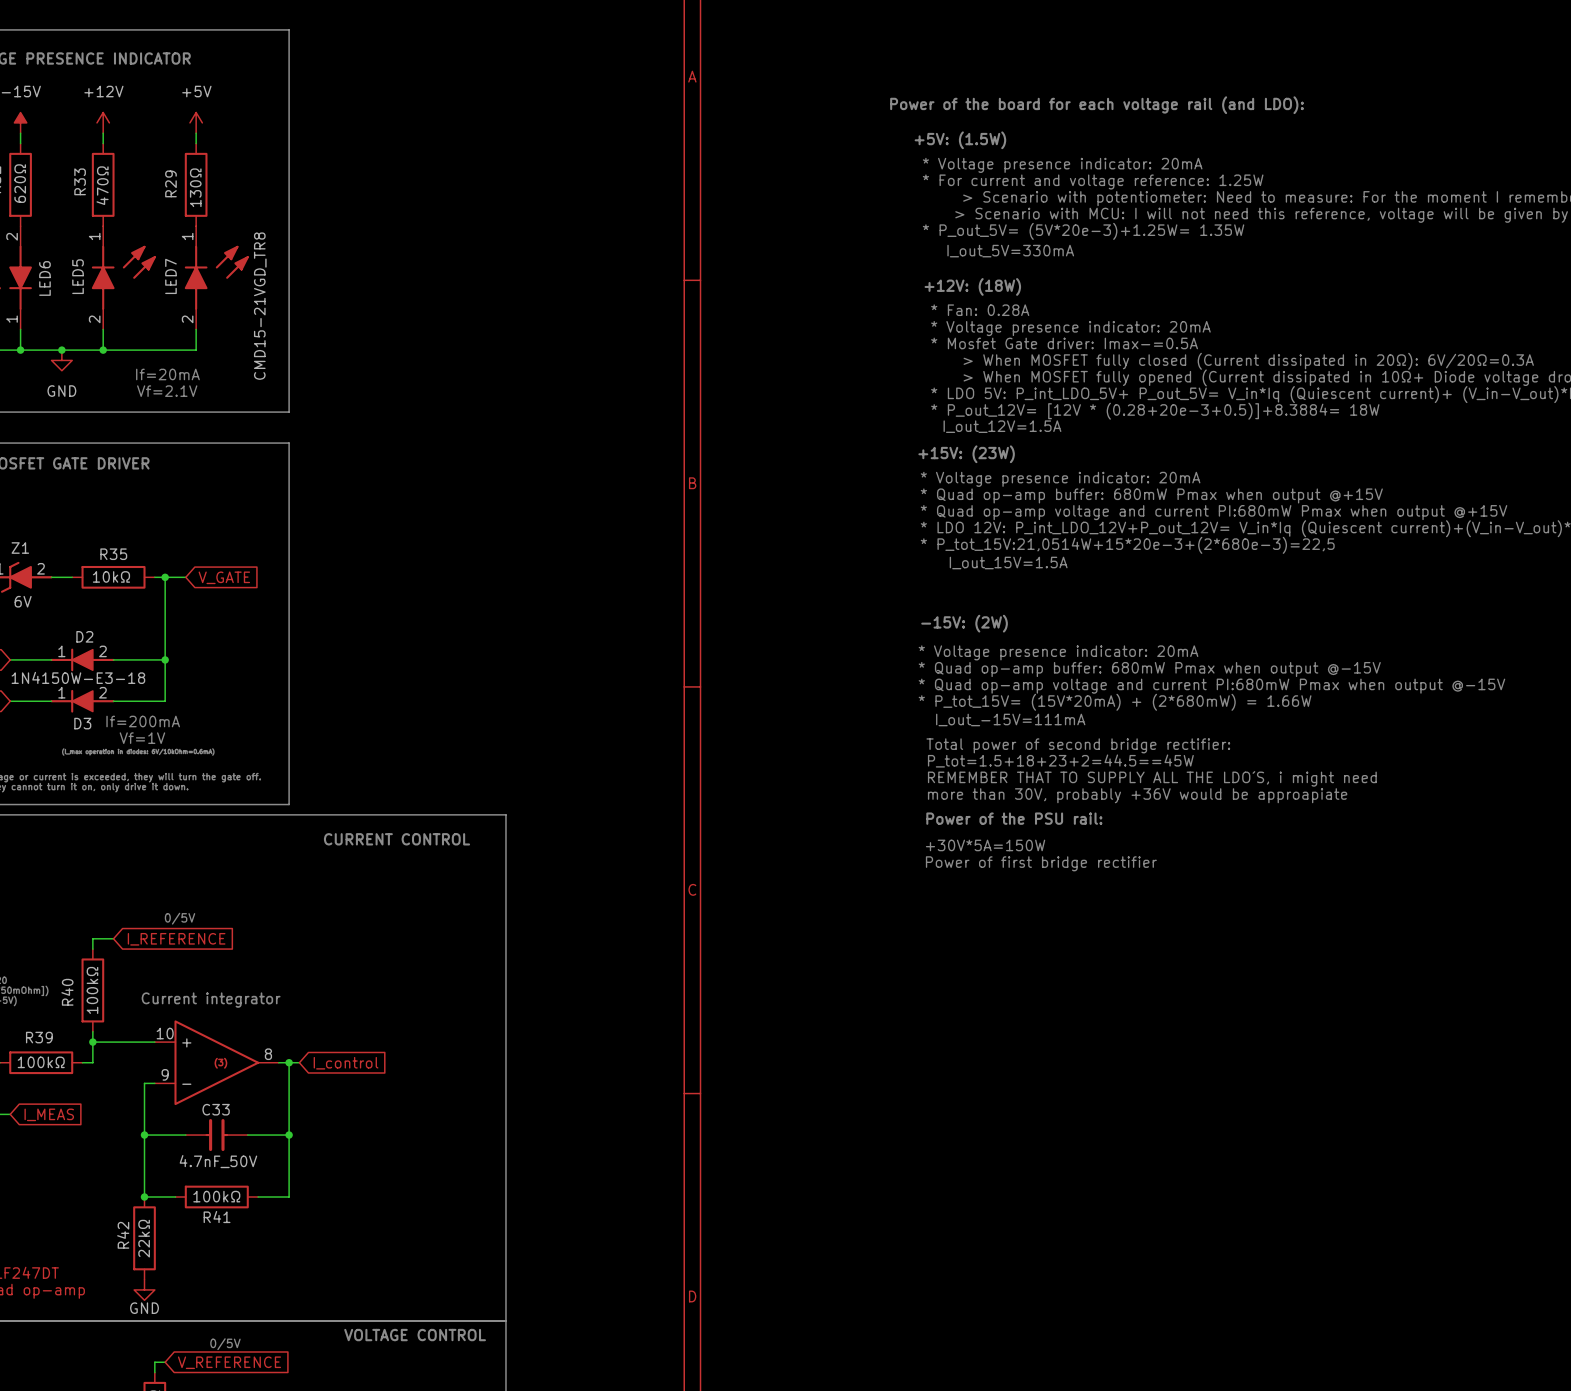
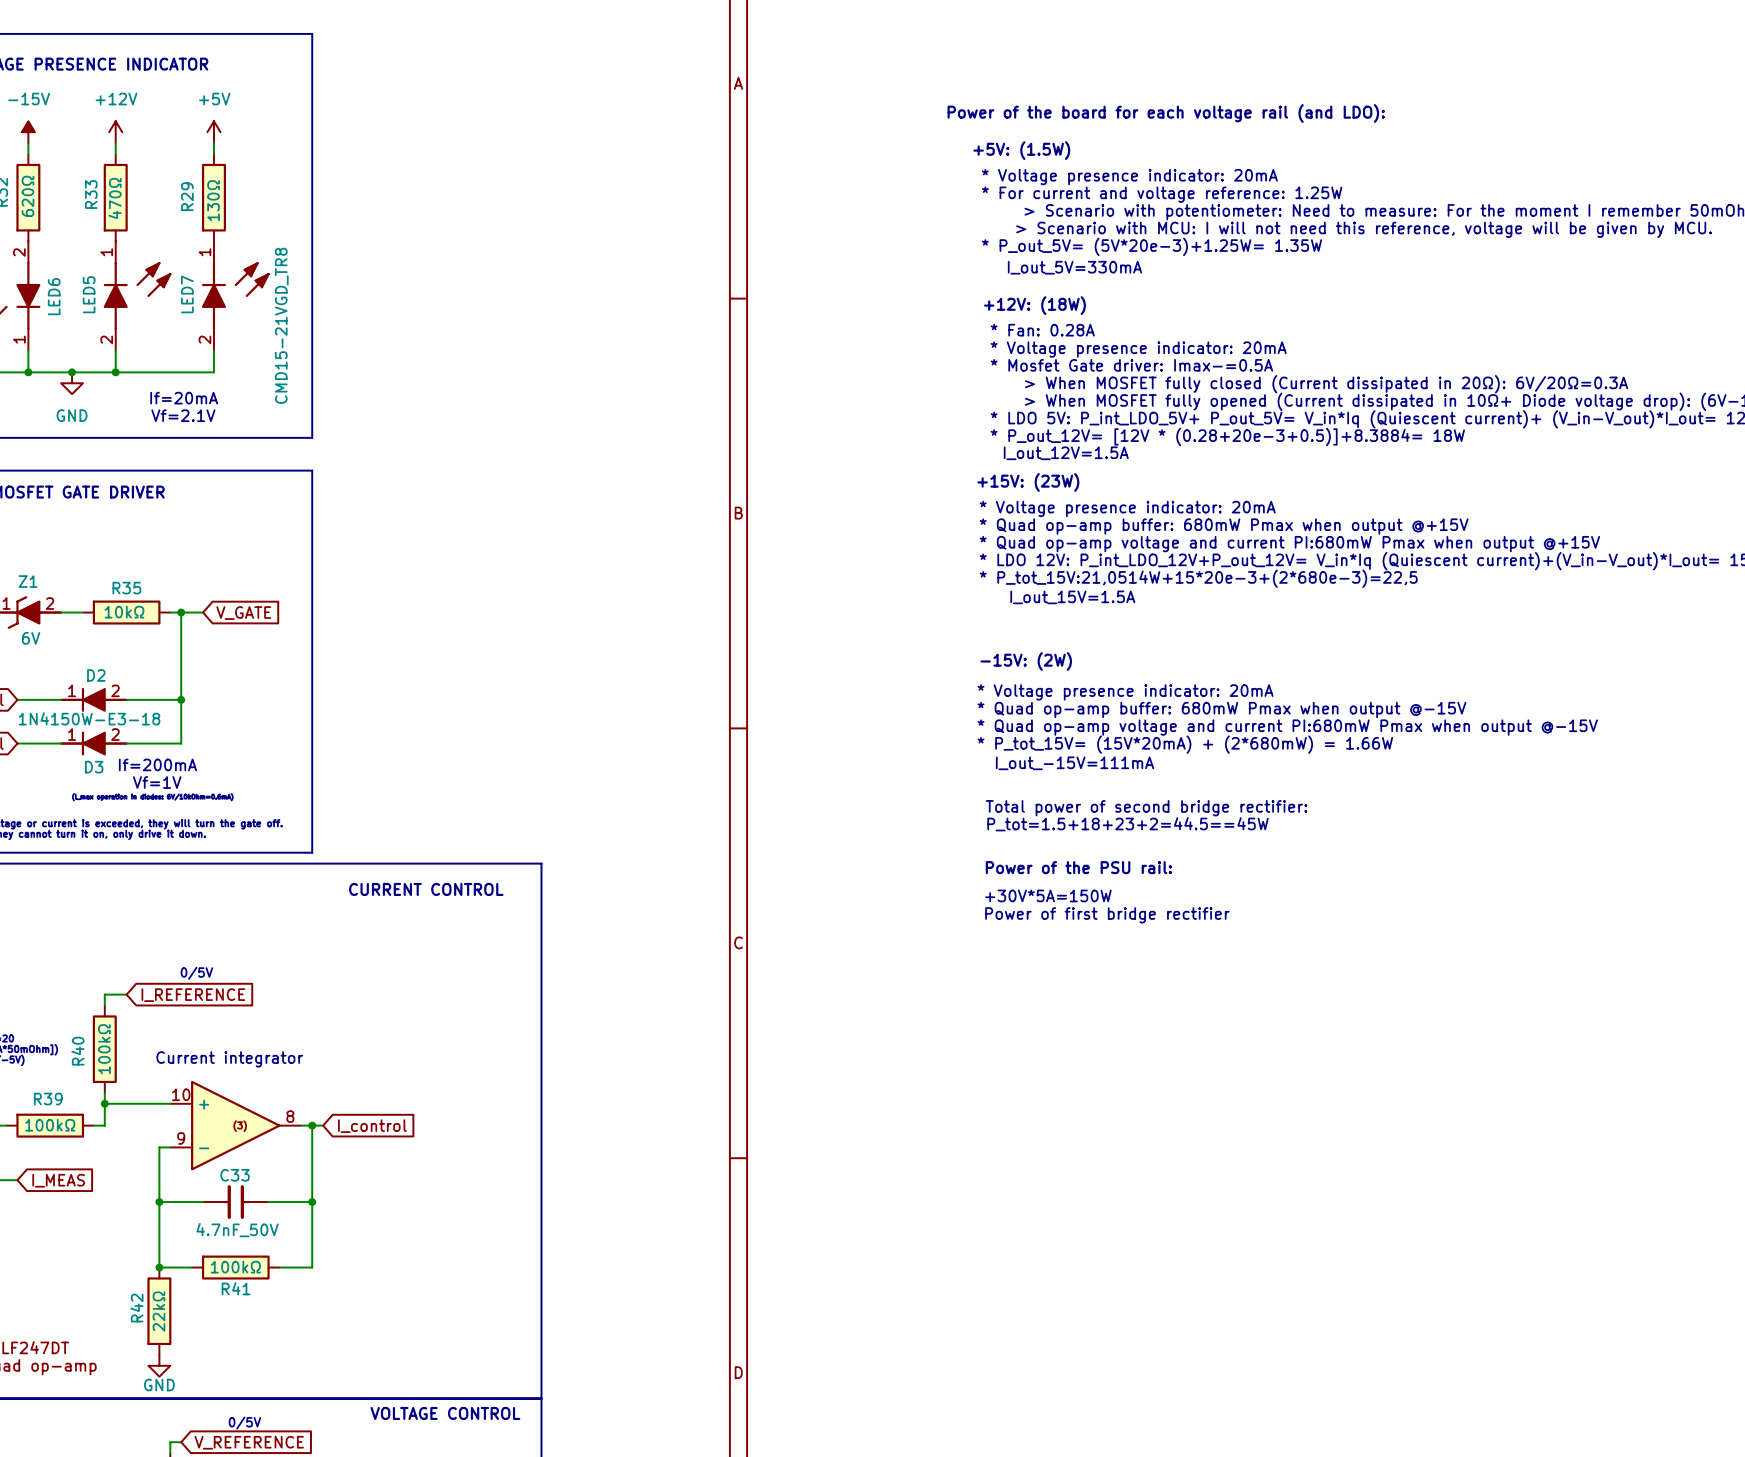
text: Total power of second bridge rectifier: (1078, 745) -> none
text: P_tot=1.5+18+23+2=44.5==45W (1060, 761) -> Total power of second bridge rectifier: (1146, 808)
text: REMEMBER THAT TO SUPPLY ALL THE LDO´S, i might need (1152, 778) -> P_tot=1.5+18+23+2=44.5==45W (1128, 824)
text: more than 30V, probably +36V would be approapiate (1137, 795) -> none

